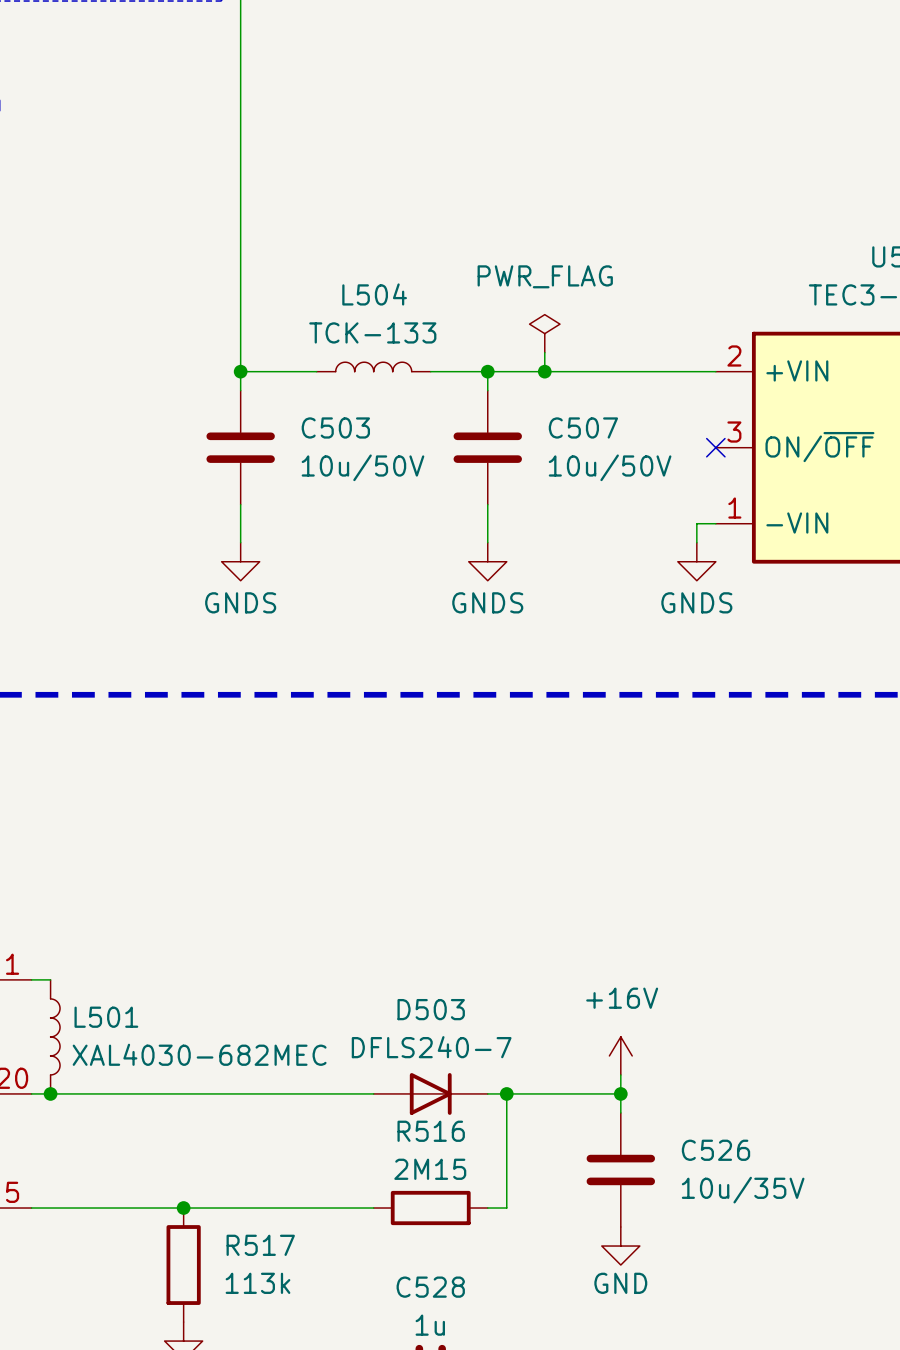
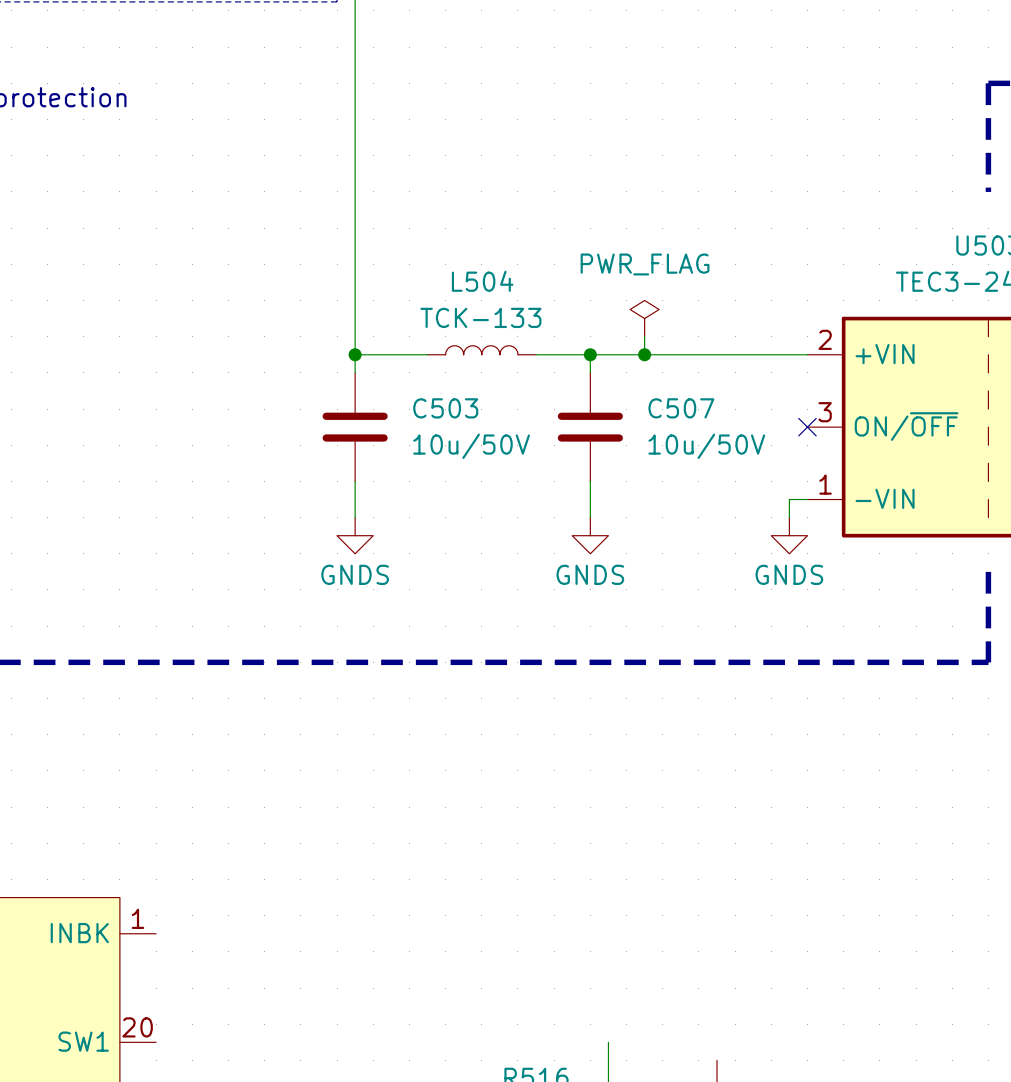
wire: (31, 979) (50, 979) -> none
L501: XAL4030-682MEC (55, 1036) -> none
power symbol: +16V (620, 1055) -> none
wire: (620, 1074) (620, 1112) -> none
wire: (31, 1093) (373, 1093) -> none
junction: (50, 1093) -> none
D503: DFLS240-7 (430, 1093) -> none
wire: (487, 1093) (620, 1093) -> none
junction: (506, 1093) -> none
junction: (620, 1093) -> none

